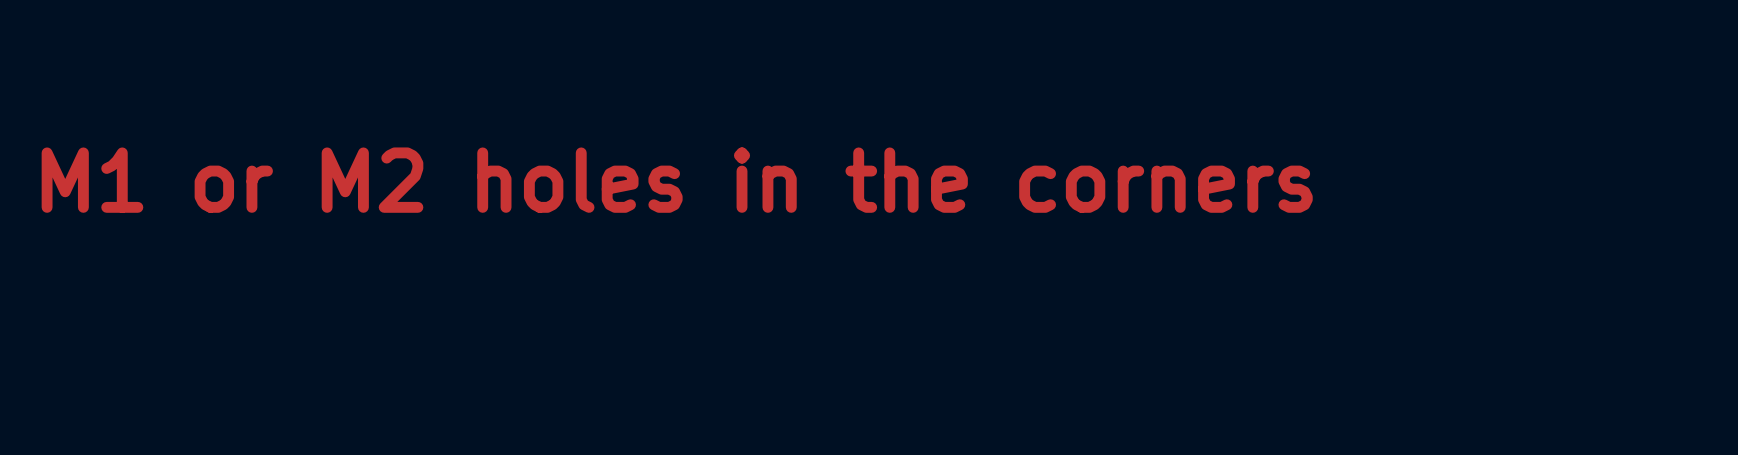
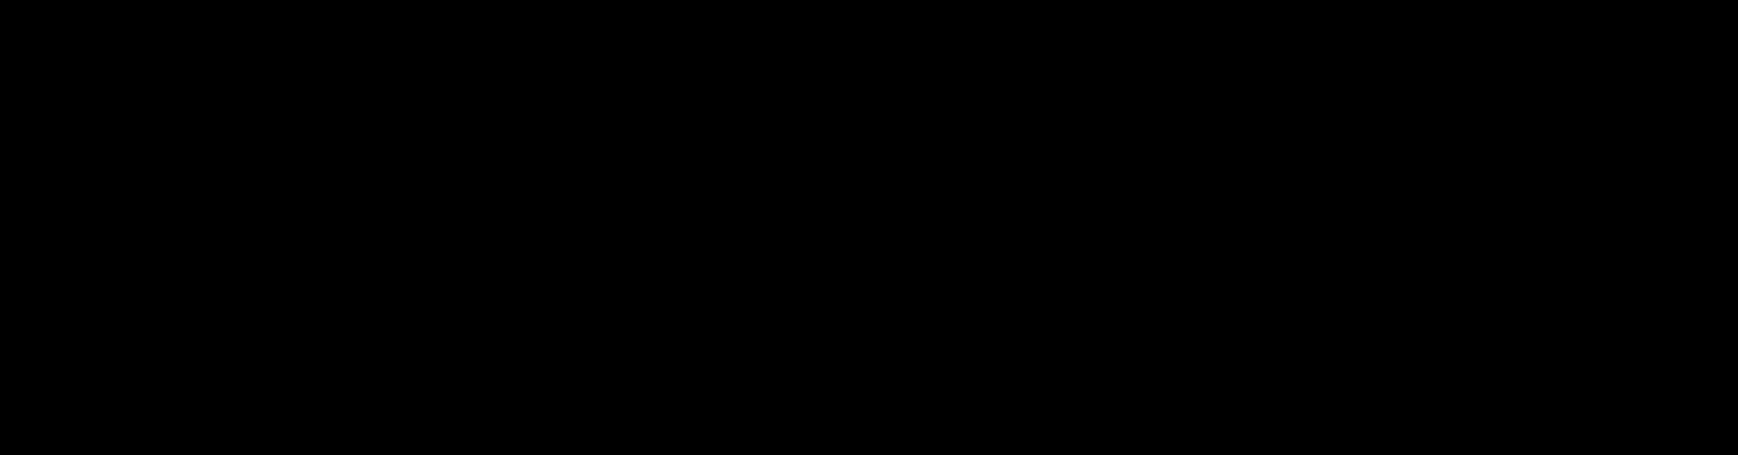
text: M1 or M2 holes in the corners (677, 180) -> none

